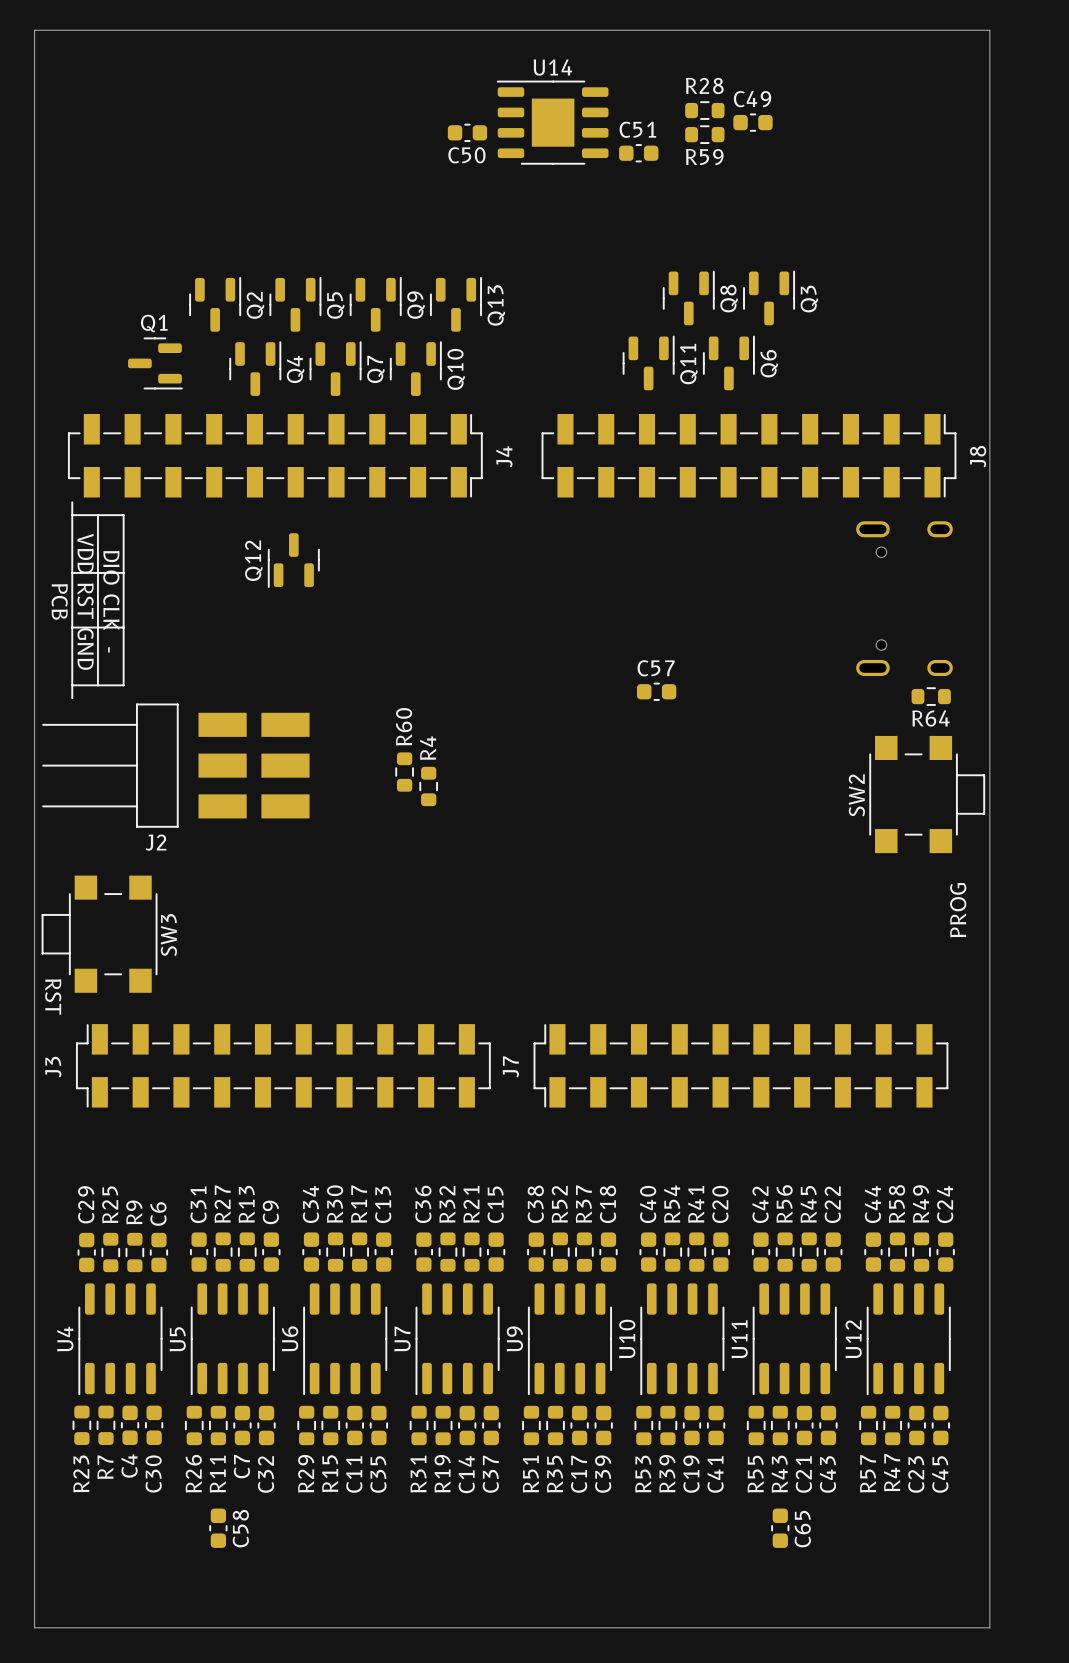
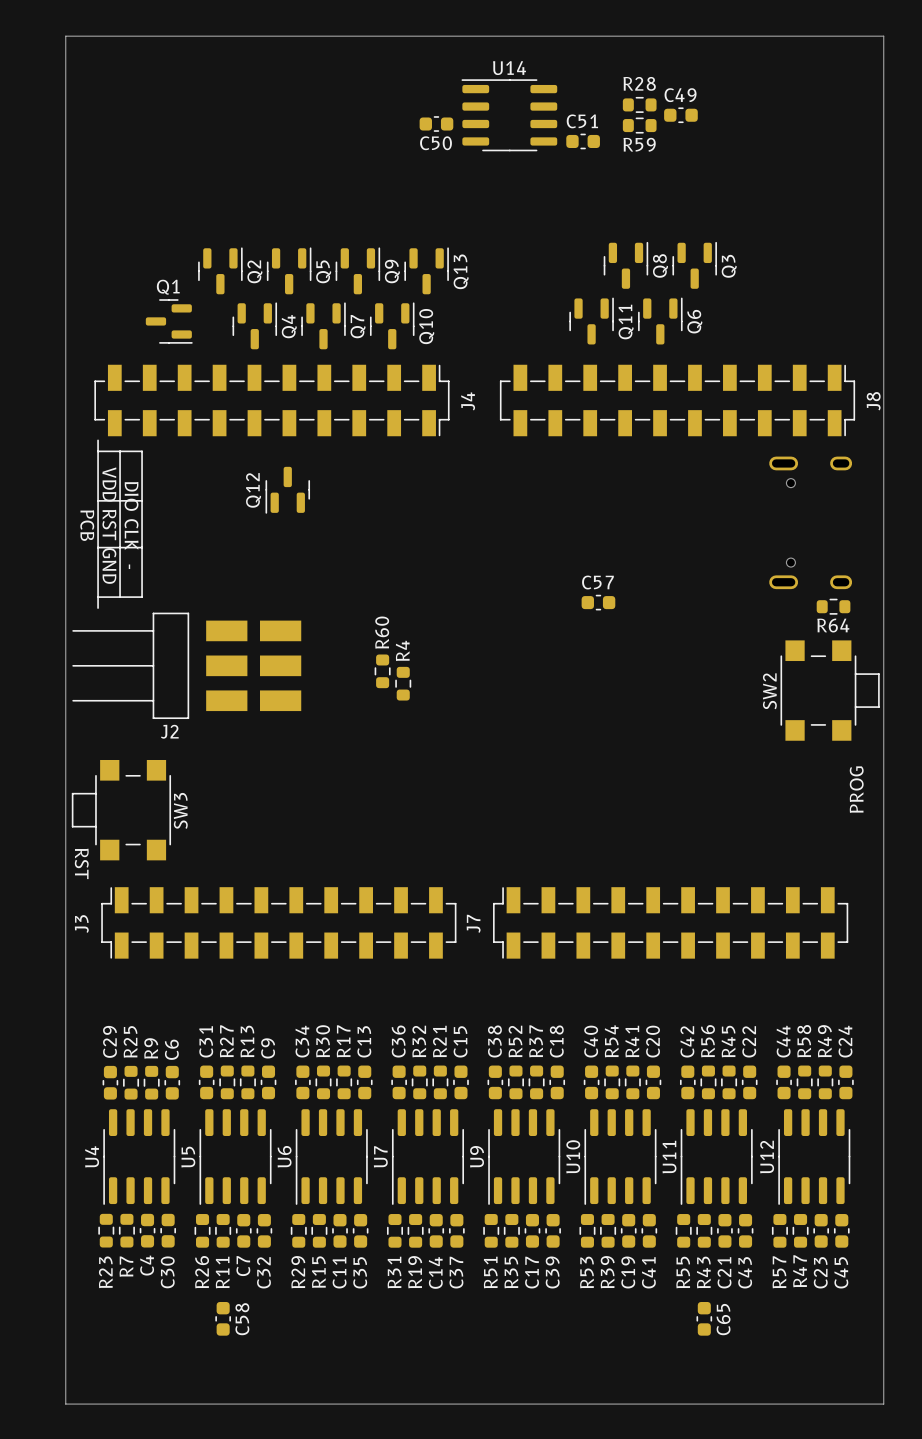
U14 footprint: [496, 80, 609, 165] -> [461, 79, 558, 152]

